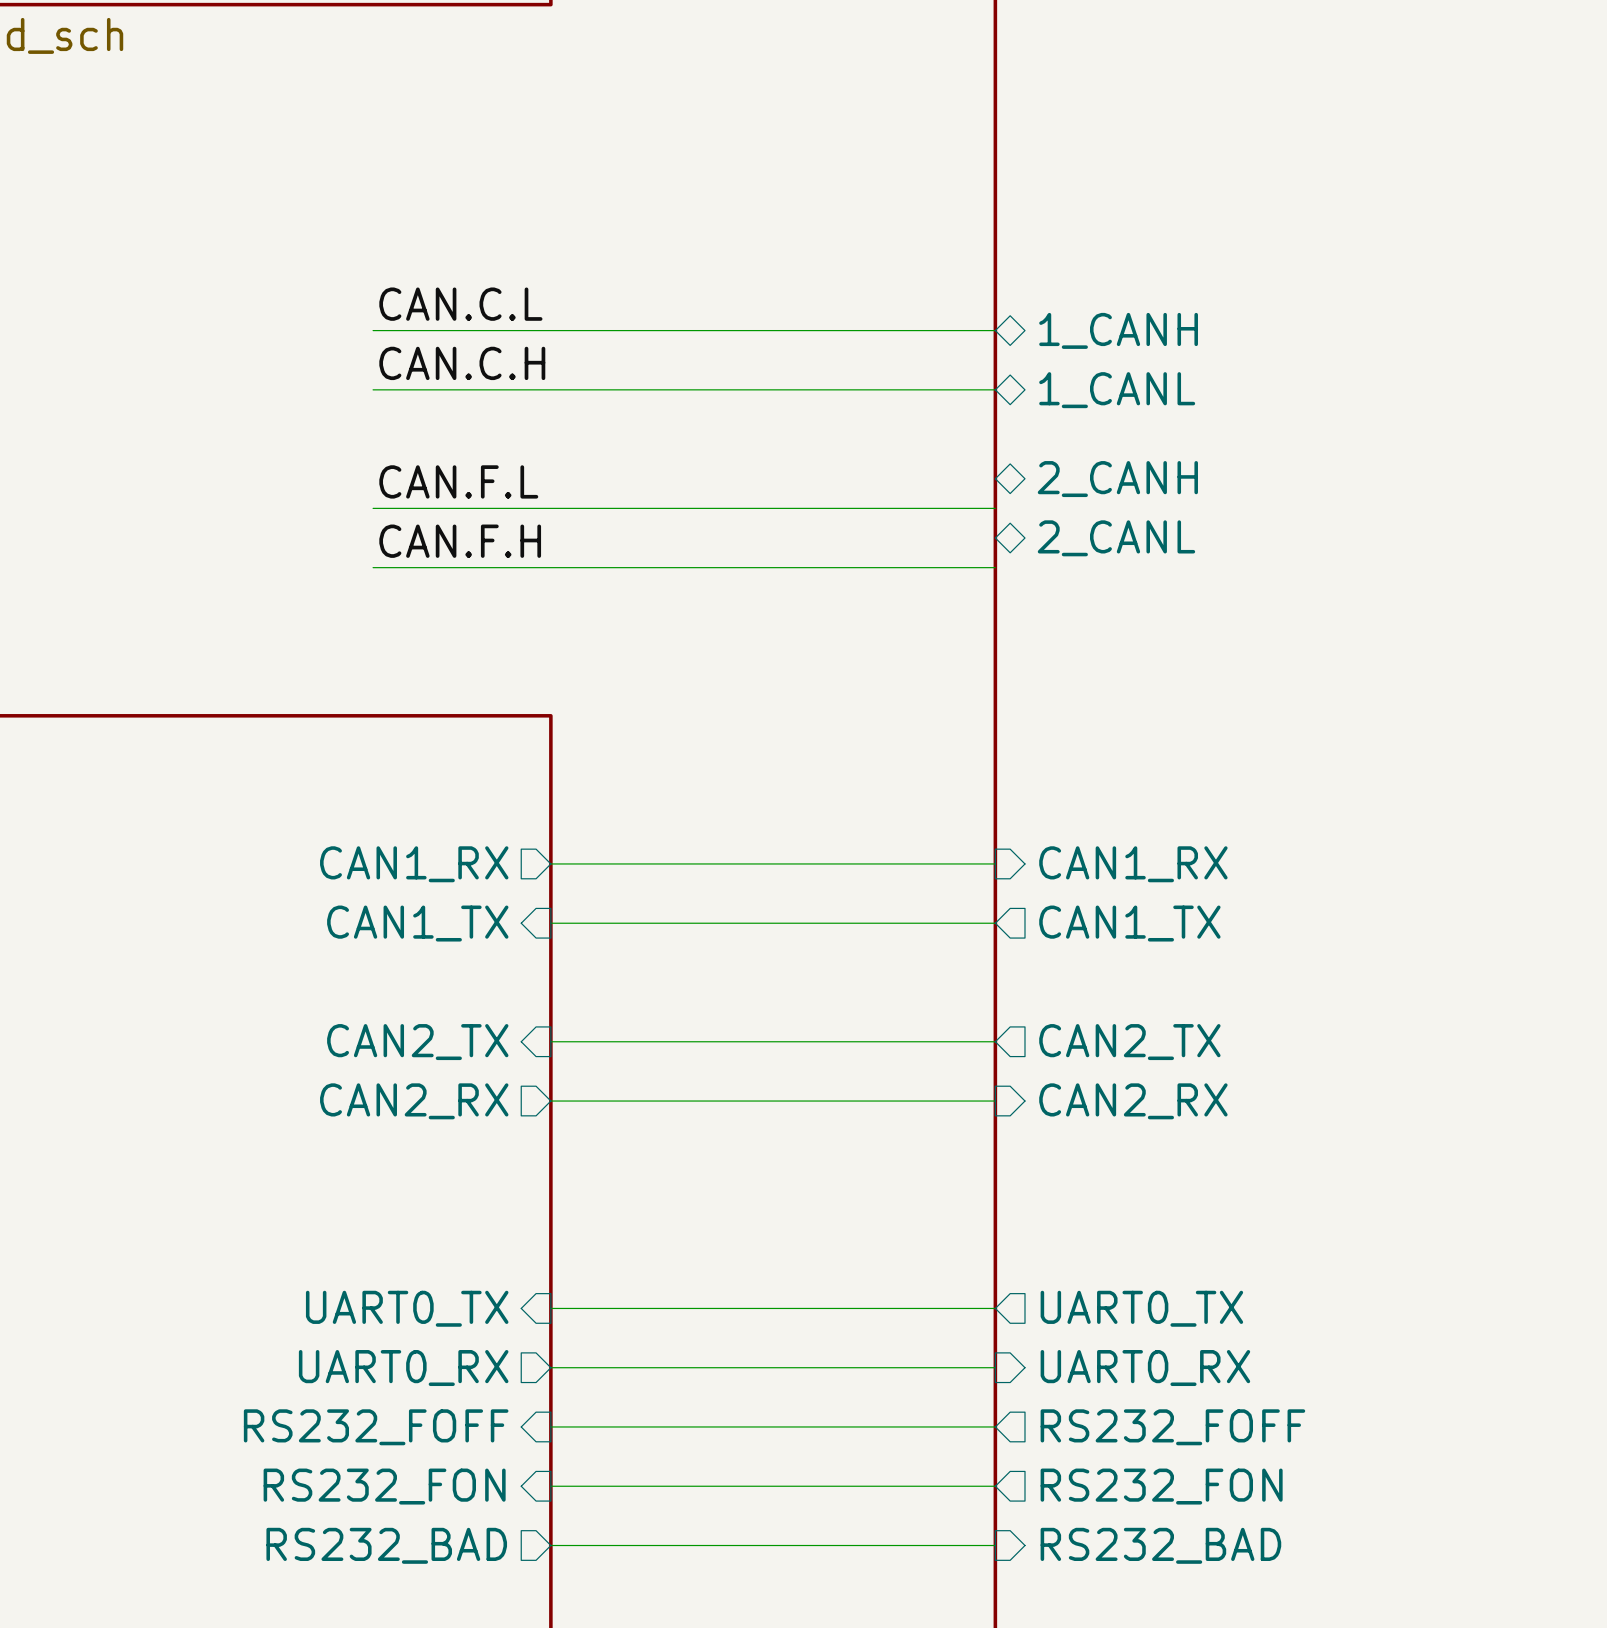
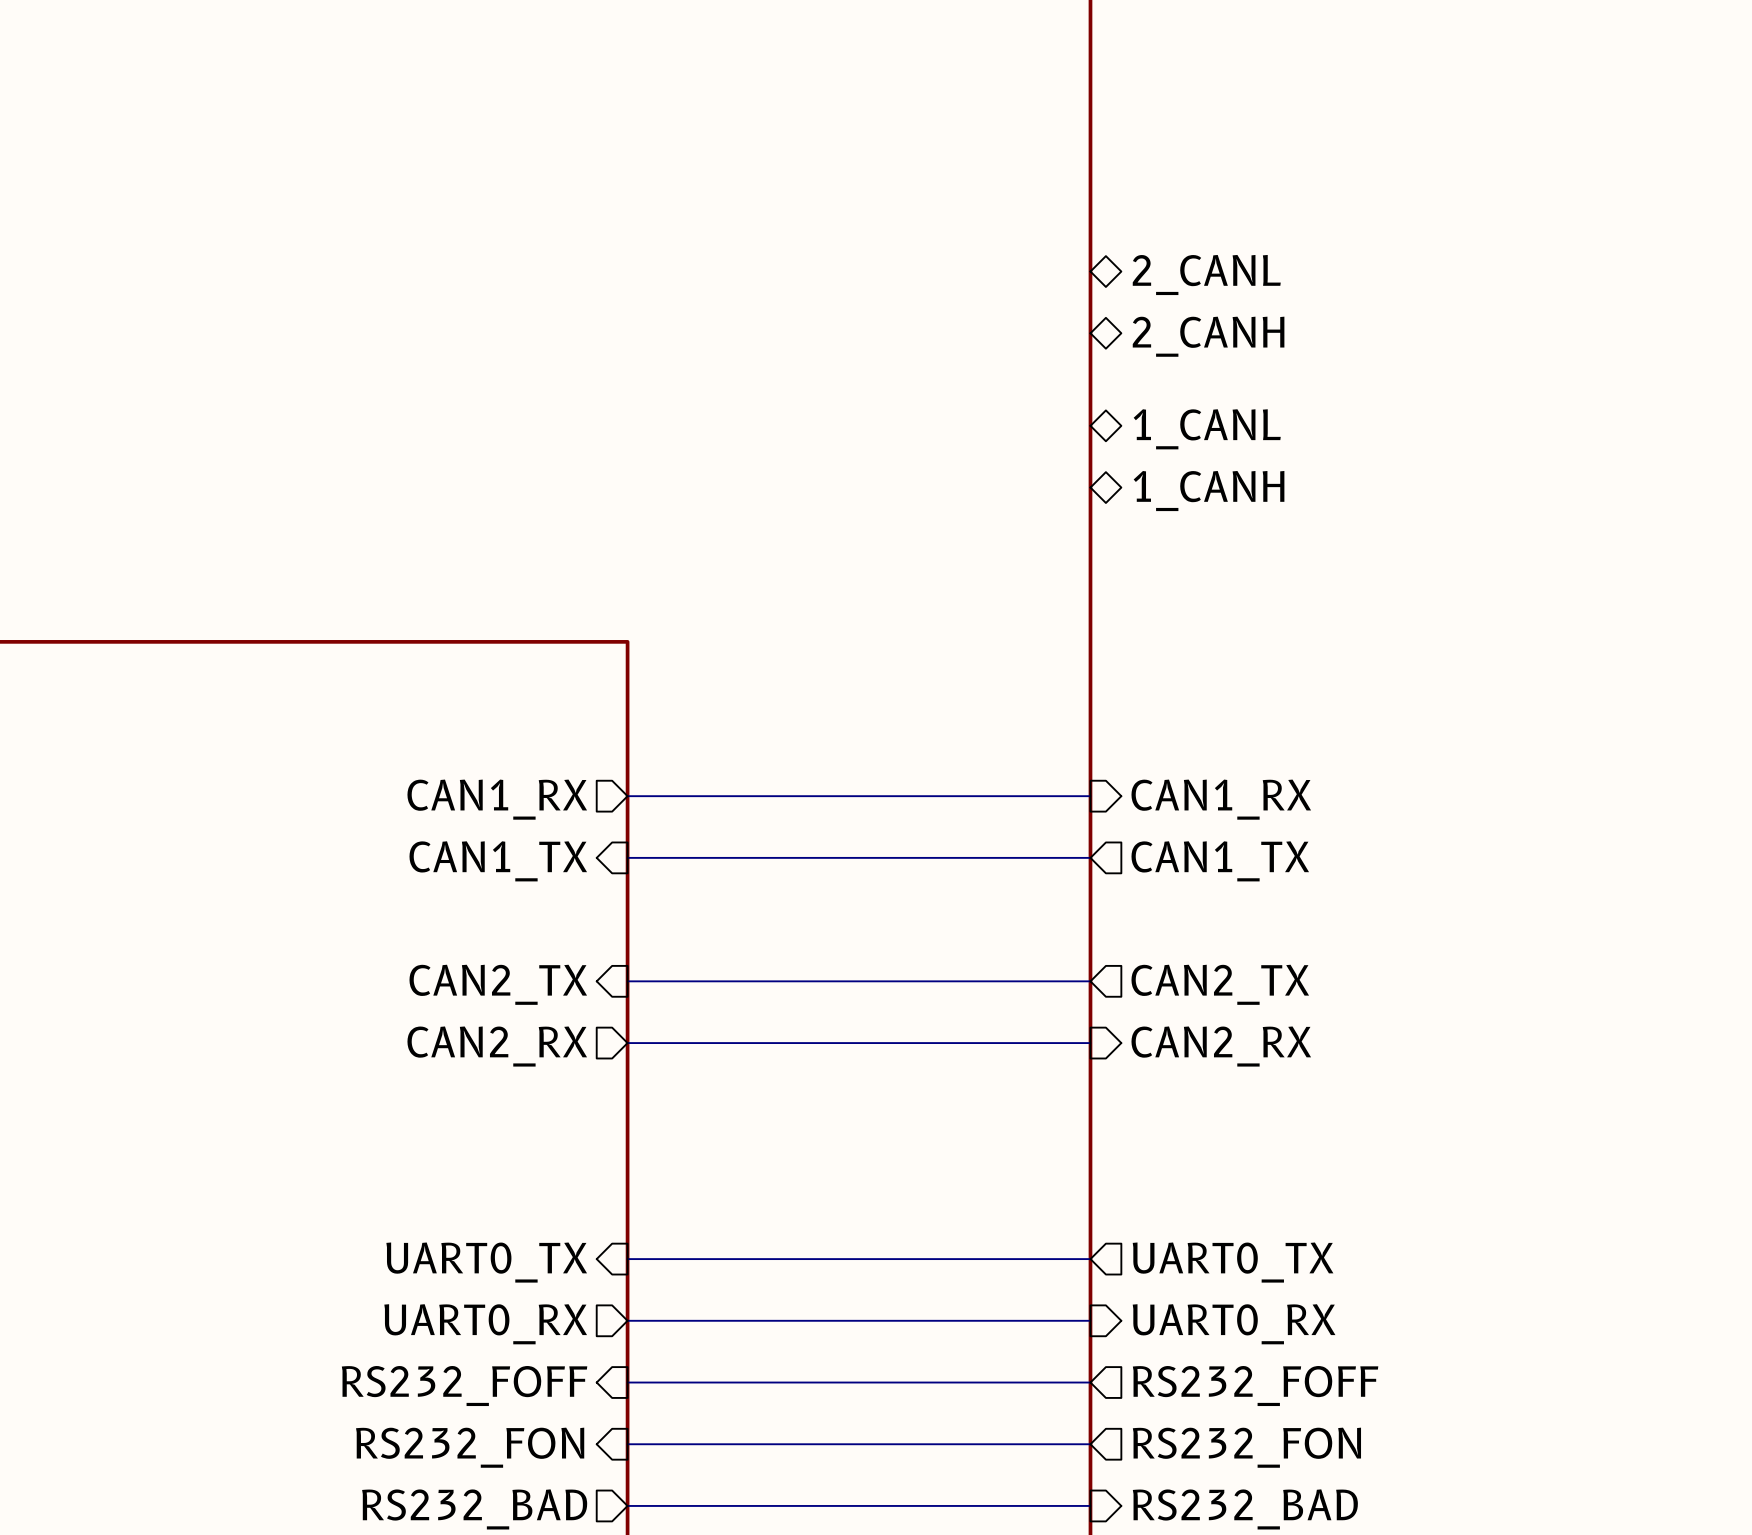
label: CAN.C.L (460, 304) -> none
wire: (373, 330) (995, 330) -> none
sheet pin position: 1_CANH (1118, 330) -> 1_CANH (1209, 491)
label: CAN.C.H (462, 363) -> none
wire: (373, 389) (995, 389) -> none
sheet pin position: 1_CANL (1117, 390) -> 1_CANL (1207, 429)
sheet pin position: 2_CANH (1117, 479) -> 2_CANH (1208, 336)
label: CAN.F.L (458, 481) -> none
wire: (373, 508) (995, 508) -> none
sheet pin position: 2_CANL (1116, 538) -> 2_CANL (1206, 275)
label: CAN.F.H (460, 541) -> none
wire: (373, 567) (995, 567) -> none

